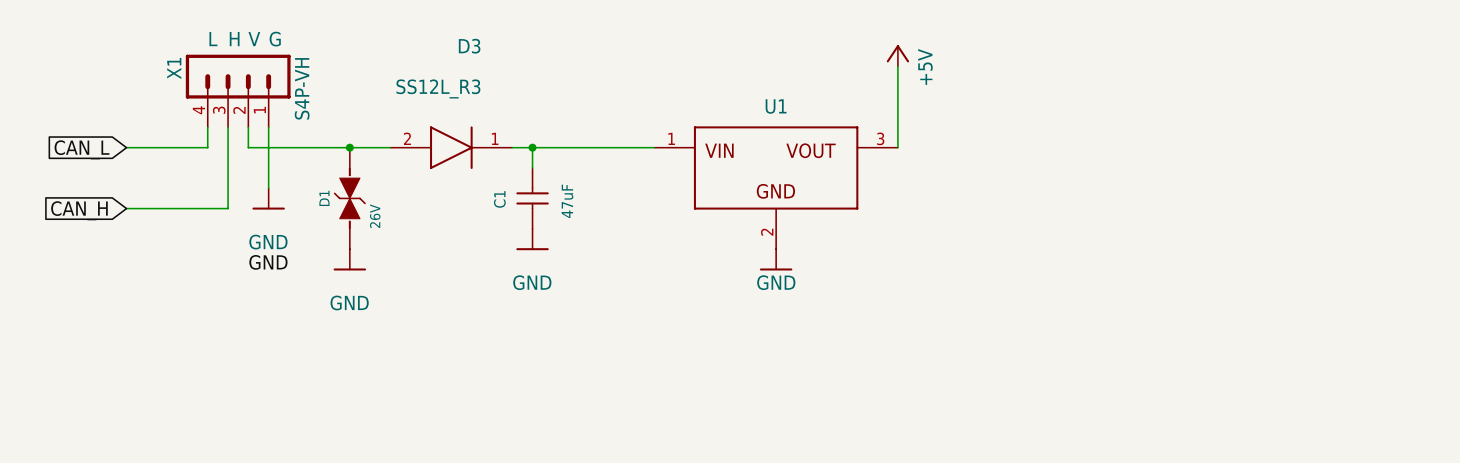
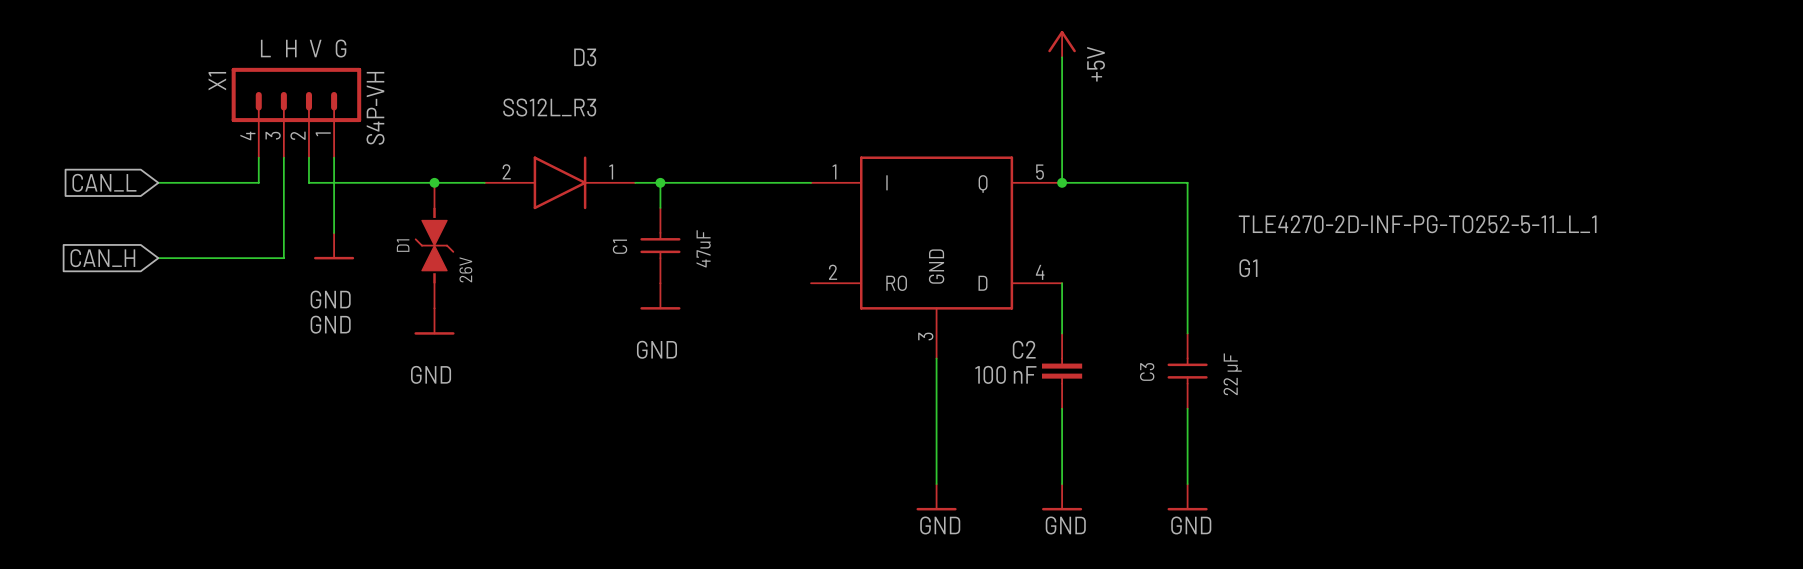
wire: none -> (1062, 57) (1062, 182) (1187, 182) (1187, 333)
power symbol position: +5V (897, 55) -> +5V (1062, 44)
wire: (897, 66) (897, 147) -> none
junction: none -> (1062, 182)
U1: (776, 187) -> none
G1: none -> TLE4270-2D-INF-PG-TO252-5-11_L_1 (936, 257)
wire: none -> (1062, 283) (1062, 333)
power symbol: GND (776, 259) -> none
wire: none -> (936, 358) (936, 484)
C2: none -> 100 nF (1062, 371)
C3: none -> 22 µF (1187, 371)
wire: none -> (1062, 408) (1062, 484)
wire: none -> (1187, 408) (1187, 484)
power symbol: none -> GND (936, 497)
power symbol: none -> GND (1062, 497)
power symbol: none -> GND (1187, 497)

